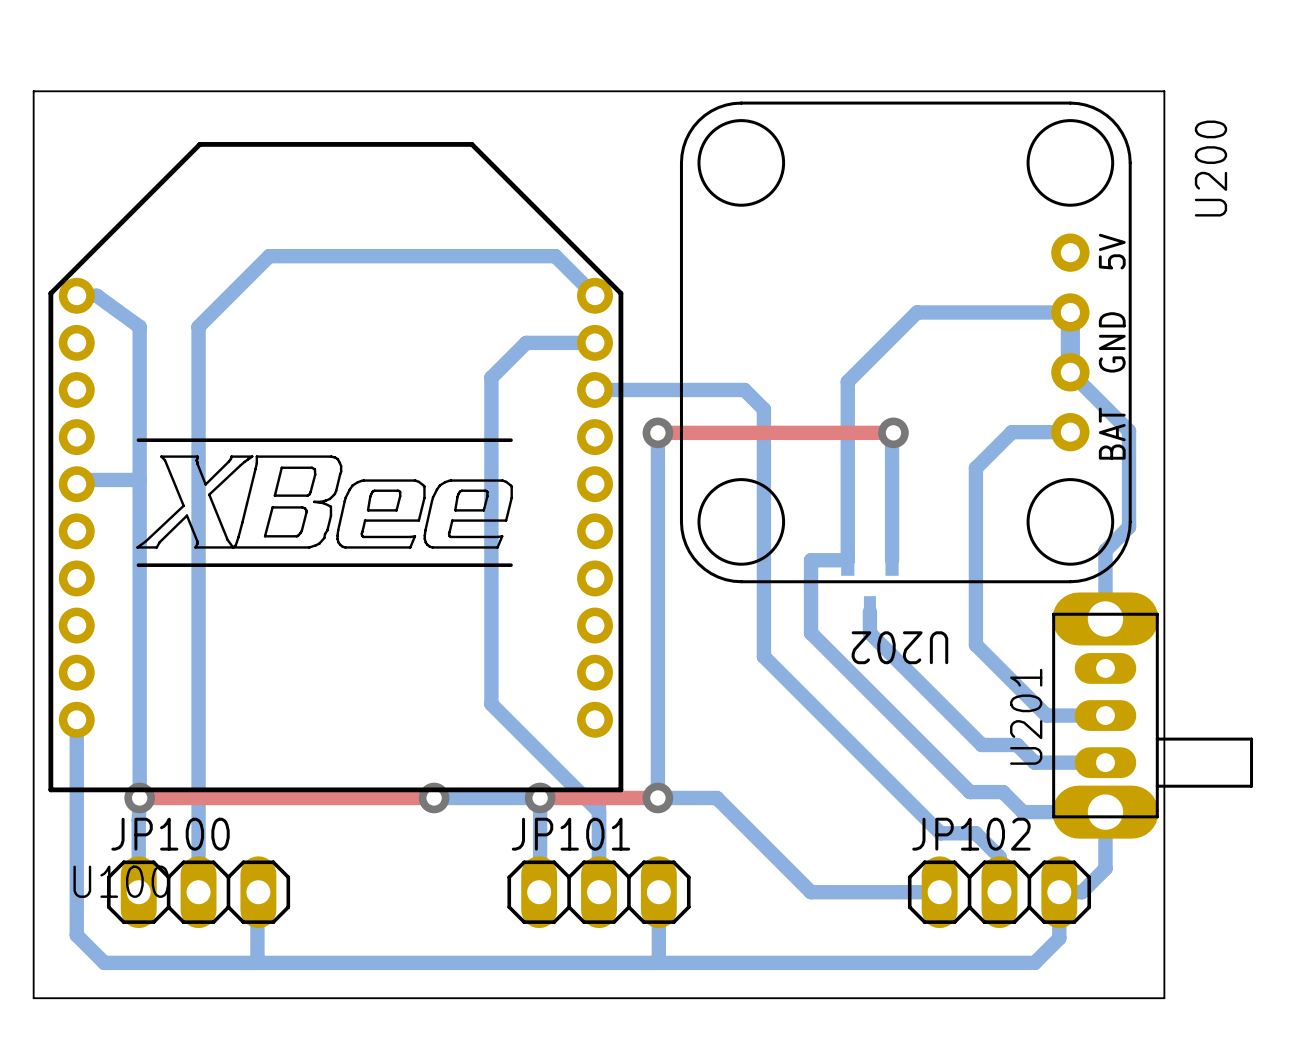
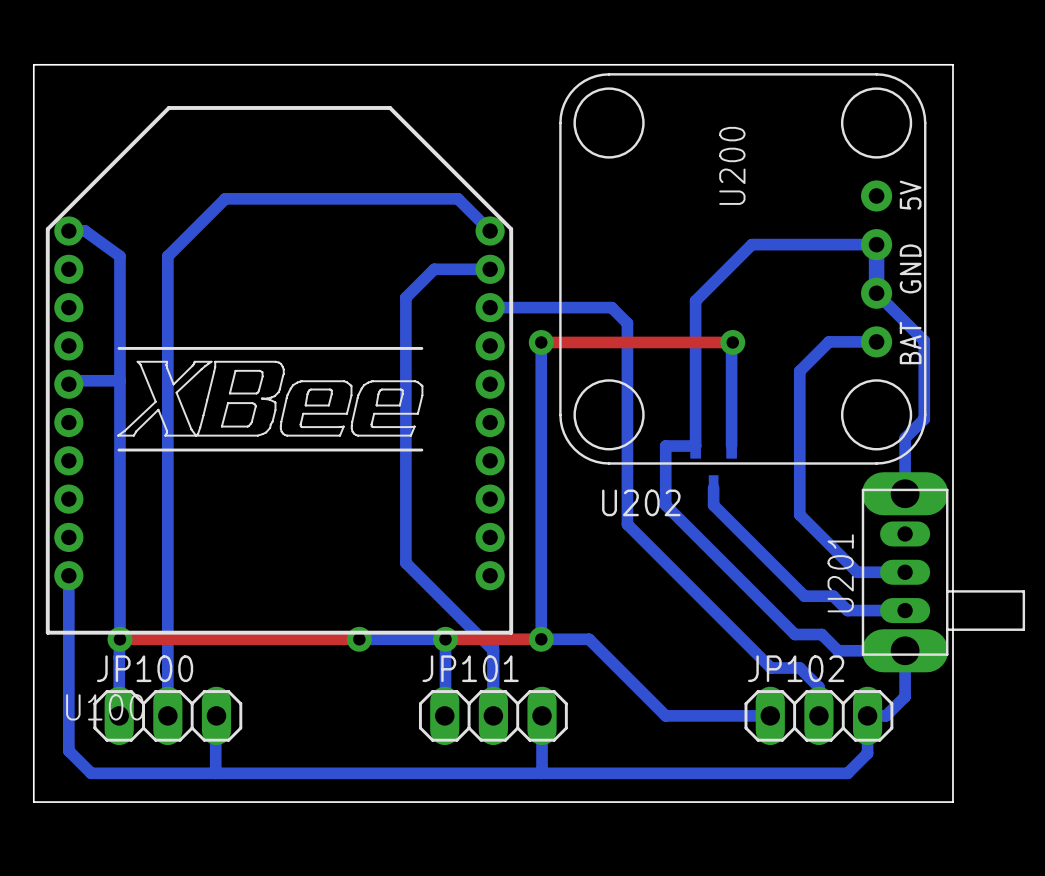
U200 name position: U200 (1210, 168) -> U200 (732, 165)
U202 name rotation: 0° (899, 647) -> 180° (641, 502)

